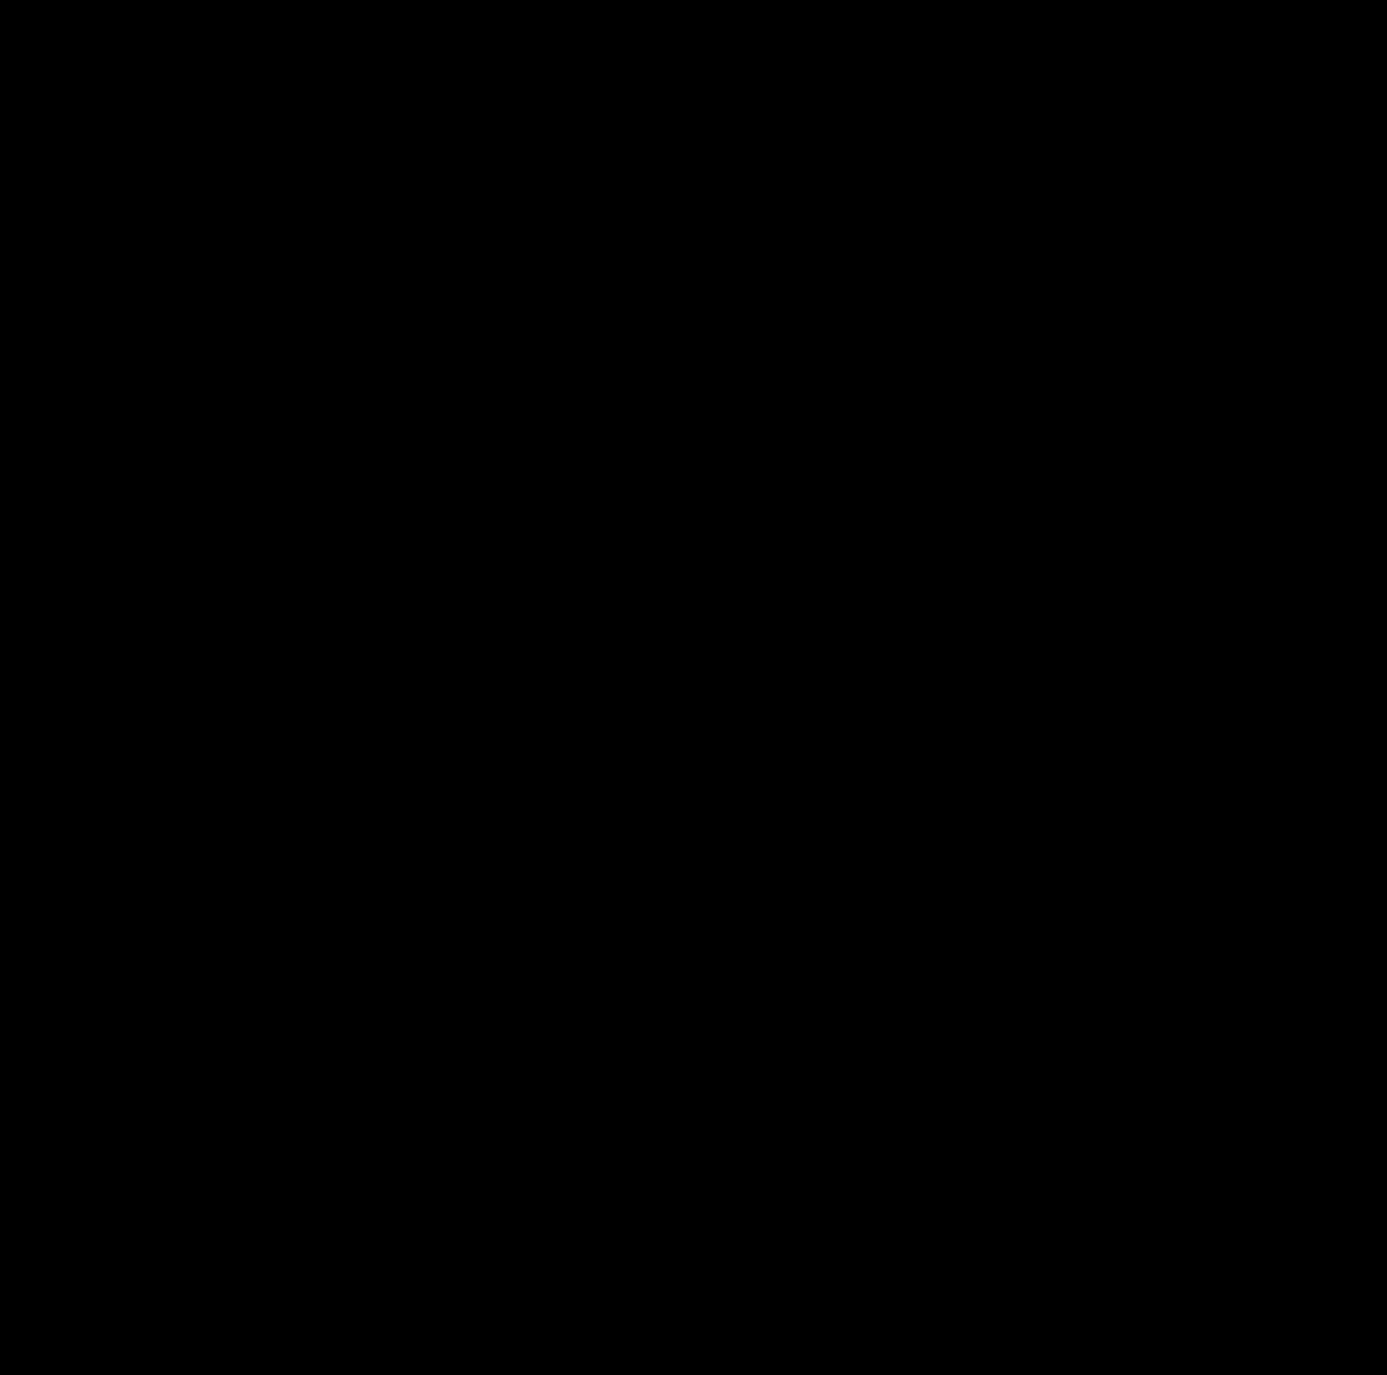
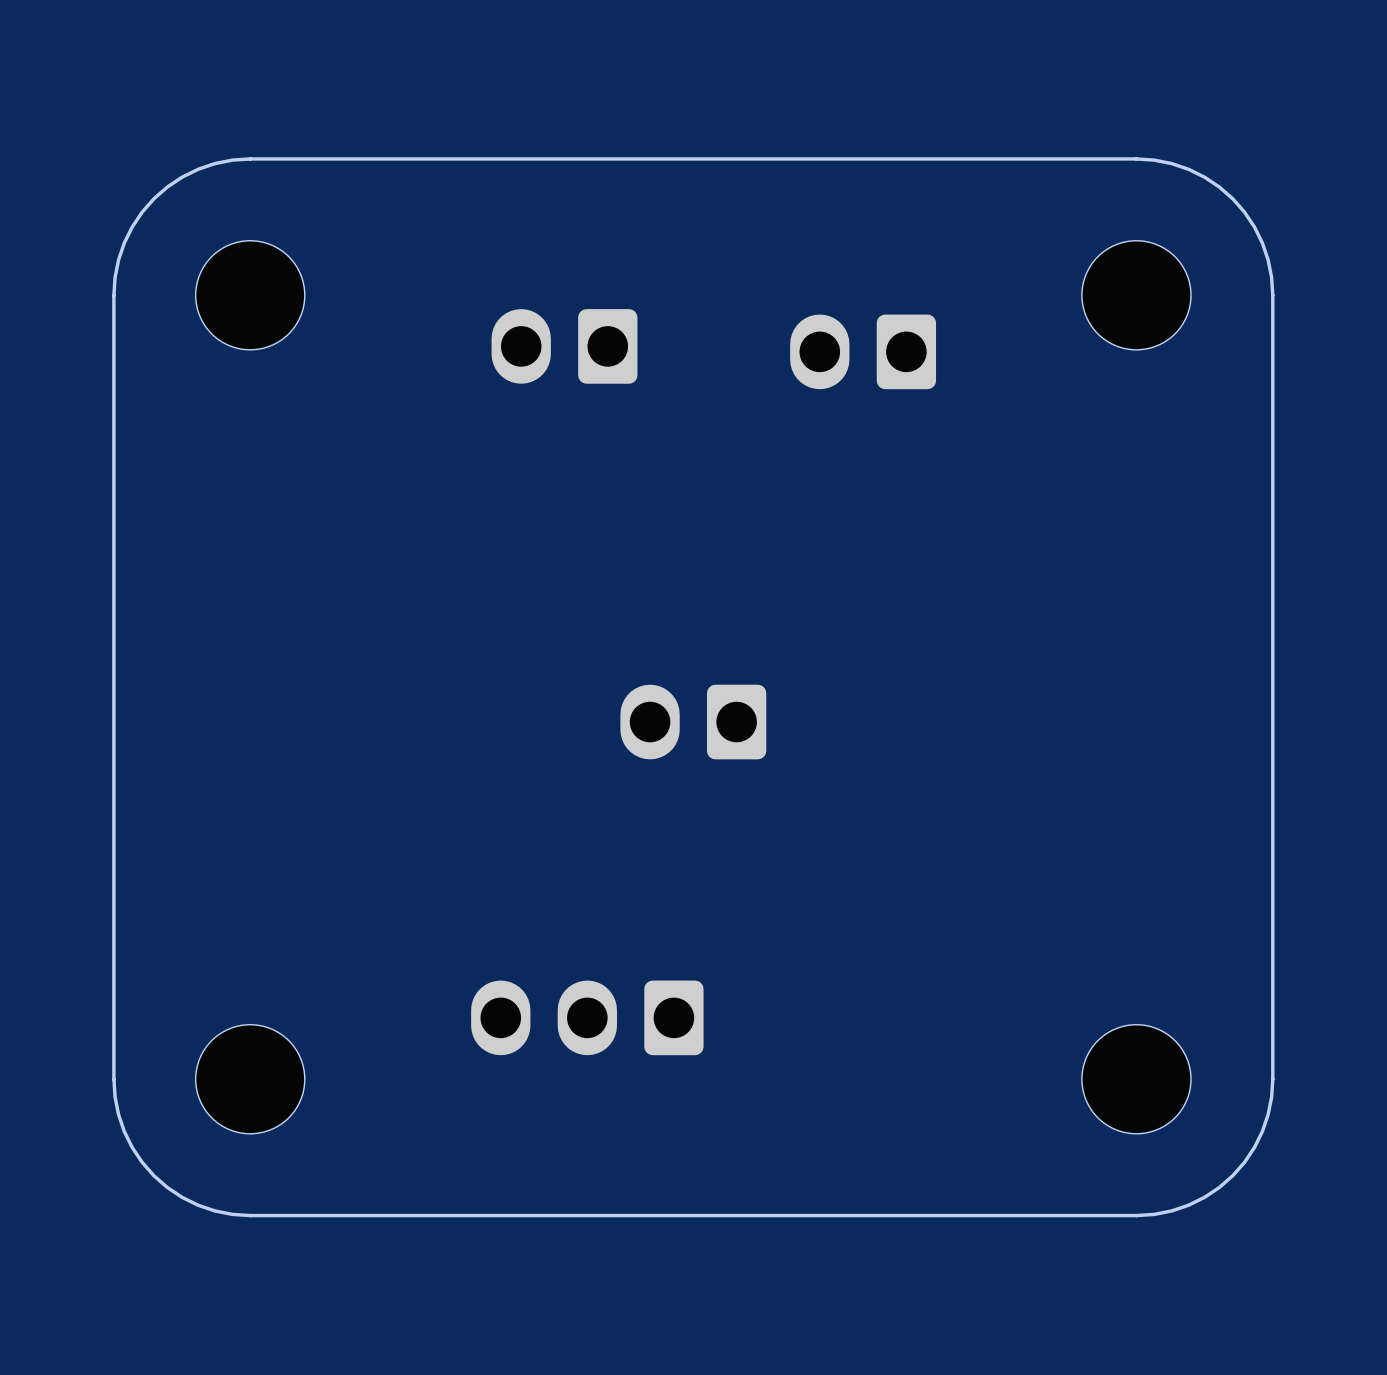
board edge: none -> (1136, 158) (250, 158) (232, 160) (198, 169) (182, 177) (153, 198) (132, 227) (124, 243) (115, 277) (113, 295) (113, 1079) (115, 1097) (124, 1131) (132, 1147) (153, 1175) (182, 1197) (198, 1205) (232, 1214) (250, 1215) (1136, 1215) (1154, 1214) (1188, 1205) (1219, 1187) (1232, 1175) (1244, 1162) (1262, 1131) (1268, 1114) (1272, 1079) (1271, 277) (1268, 260) (1254, 227) (1244, 212) (1219, 187) (1188, 169) (1171, 163) (1136, 158)
part: none -> (250, 295)
part: none -> (1136, 295)
part: none -> (564, 346)
part: none -> (863, 351)
part: none -> (693, 722)
part: none -> (587, 1017)
part: none -> (250, 1079)
part: none -> (1136, 1079)

